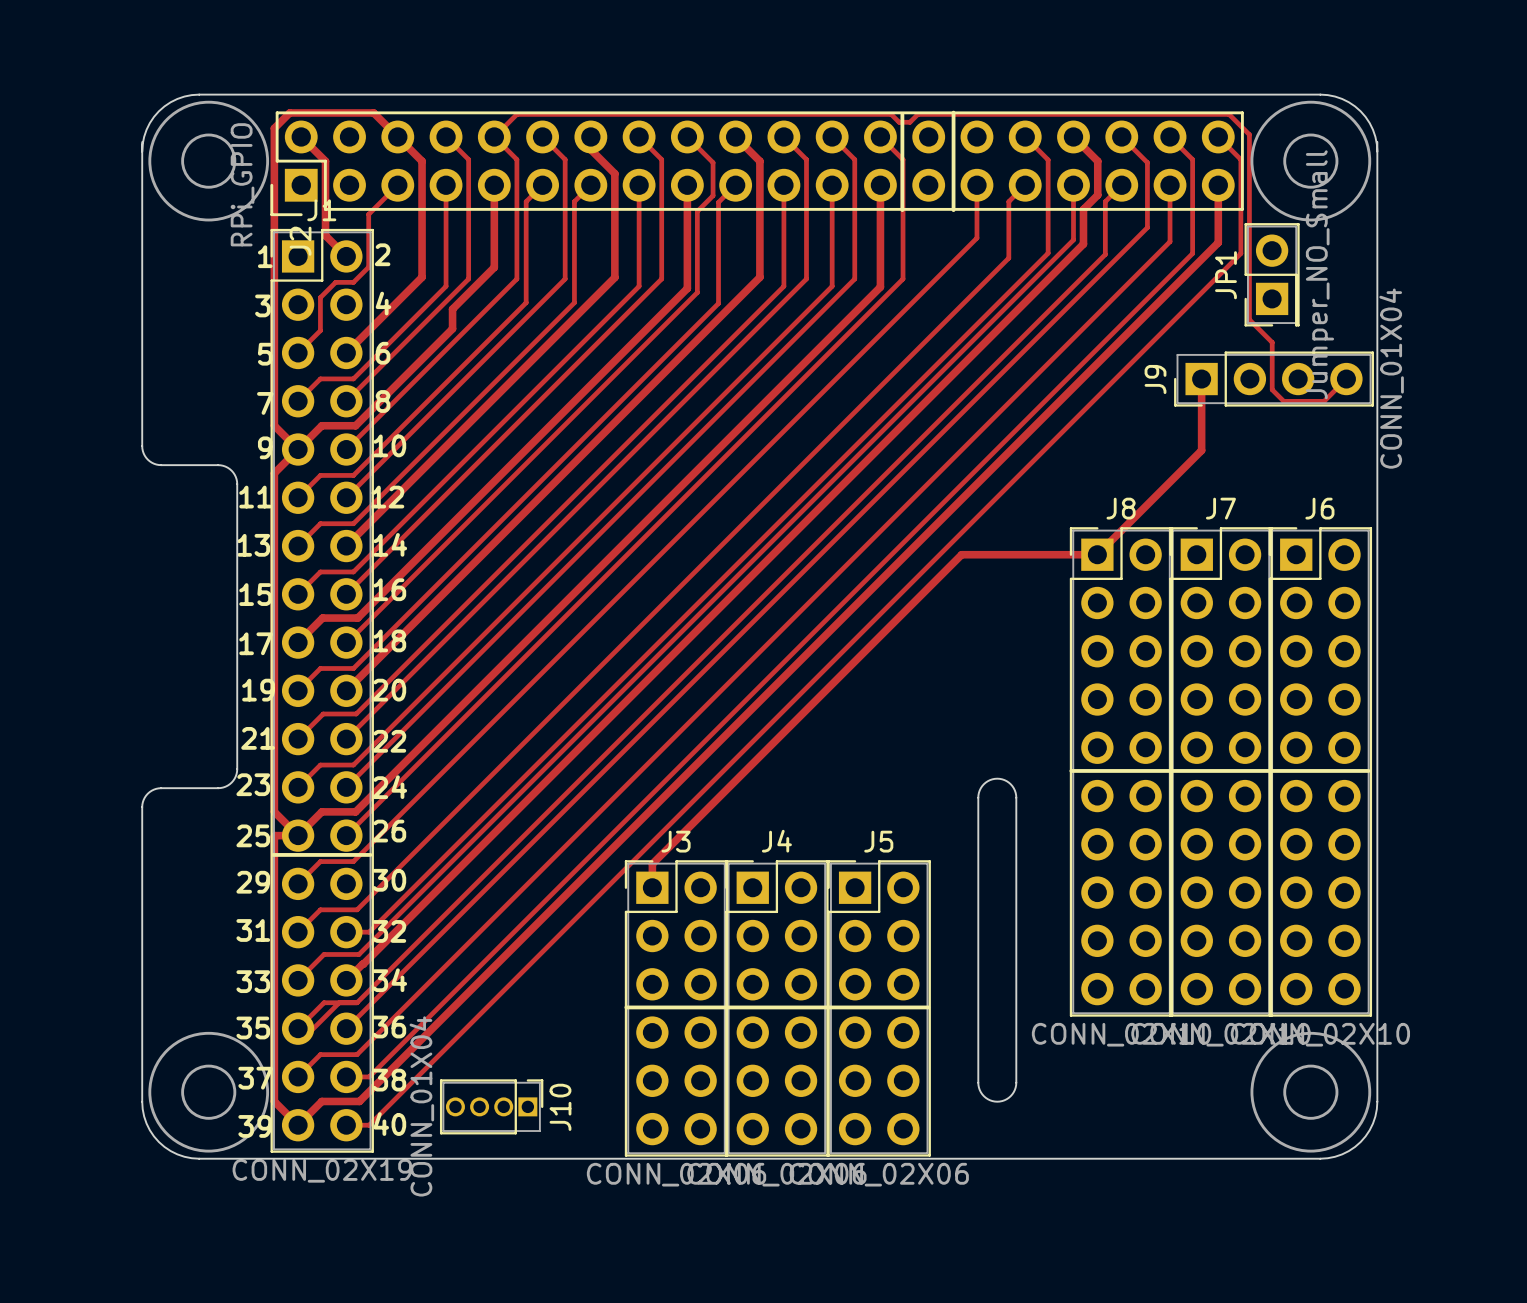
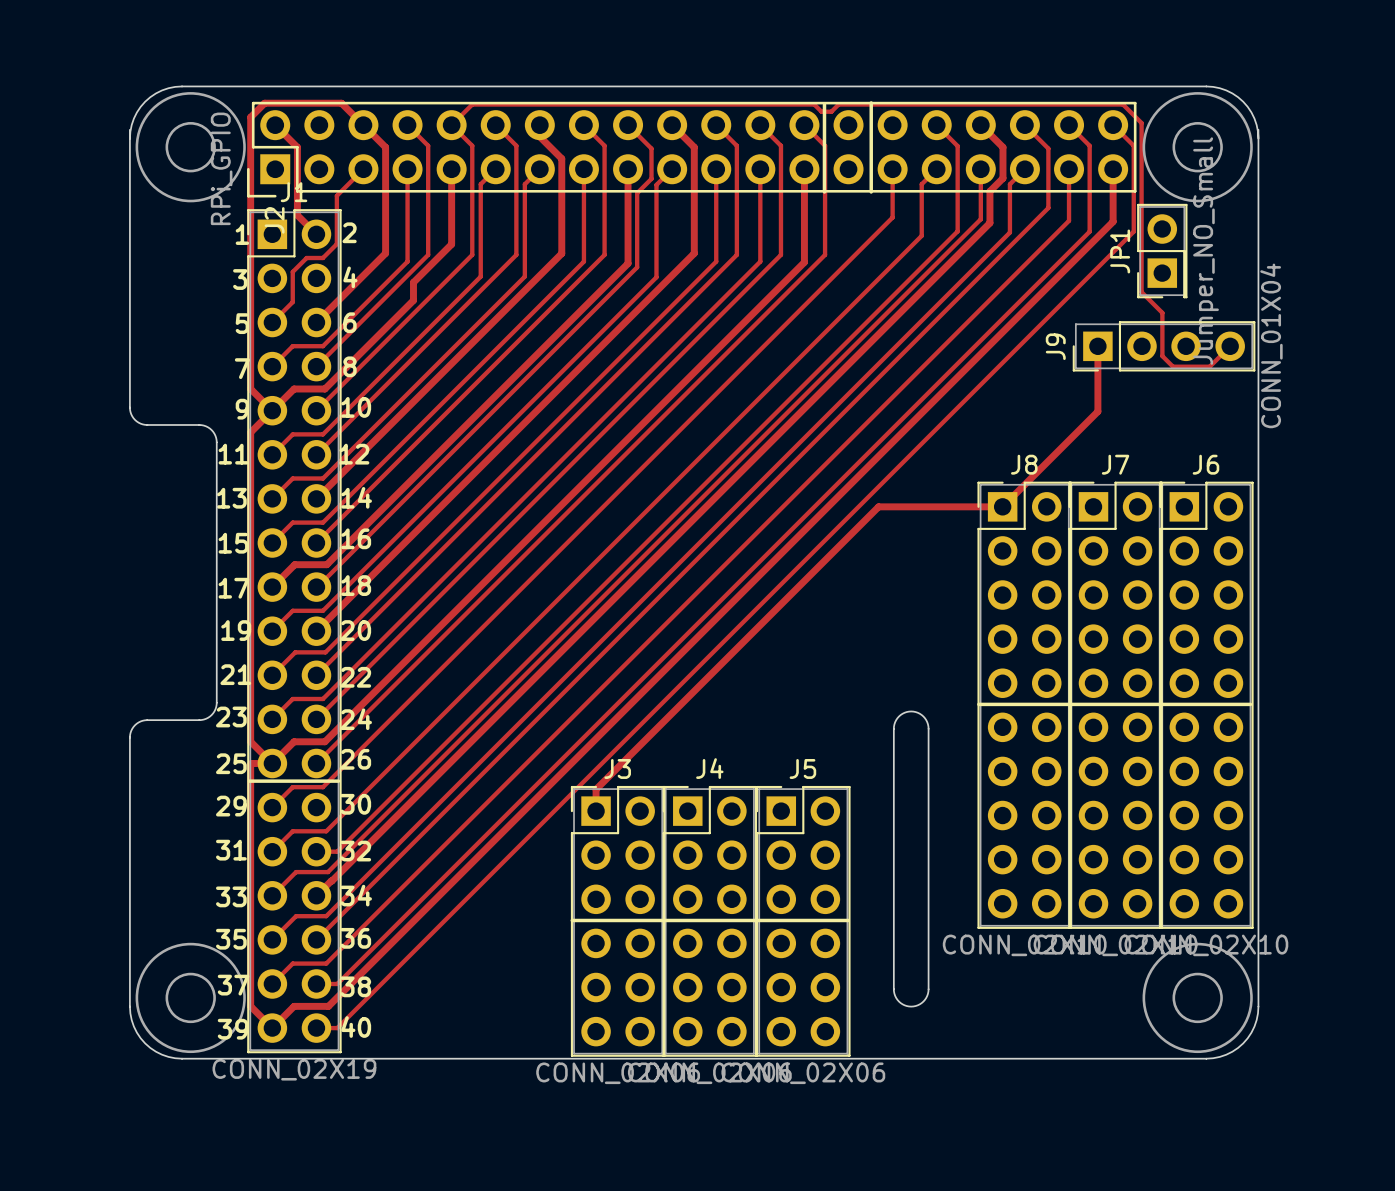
track: (339, 1002) (308, 1033) -> none
J10: CONN_01X04 (491, 1106) -> none

